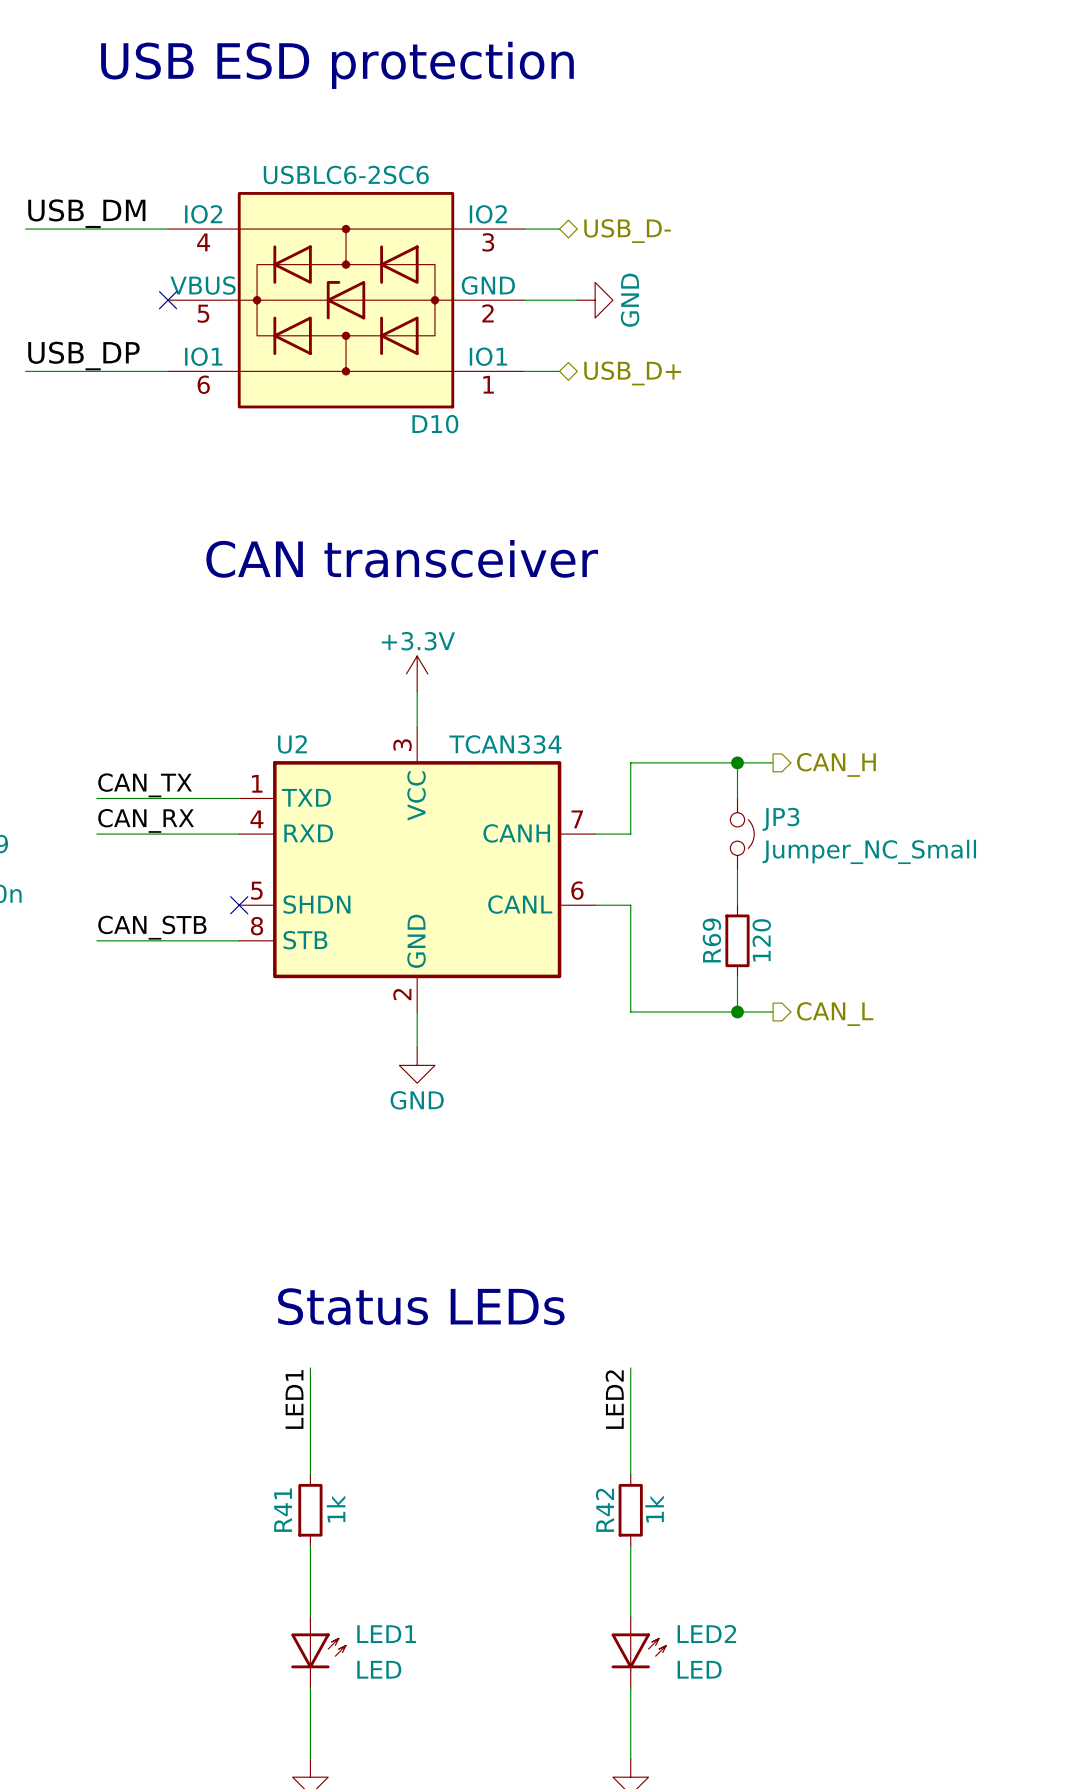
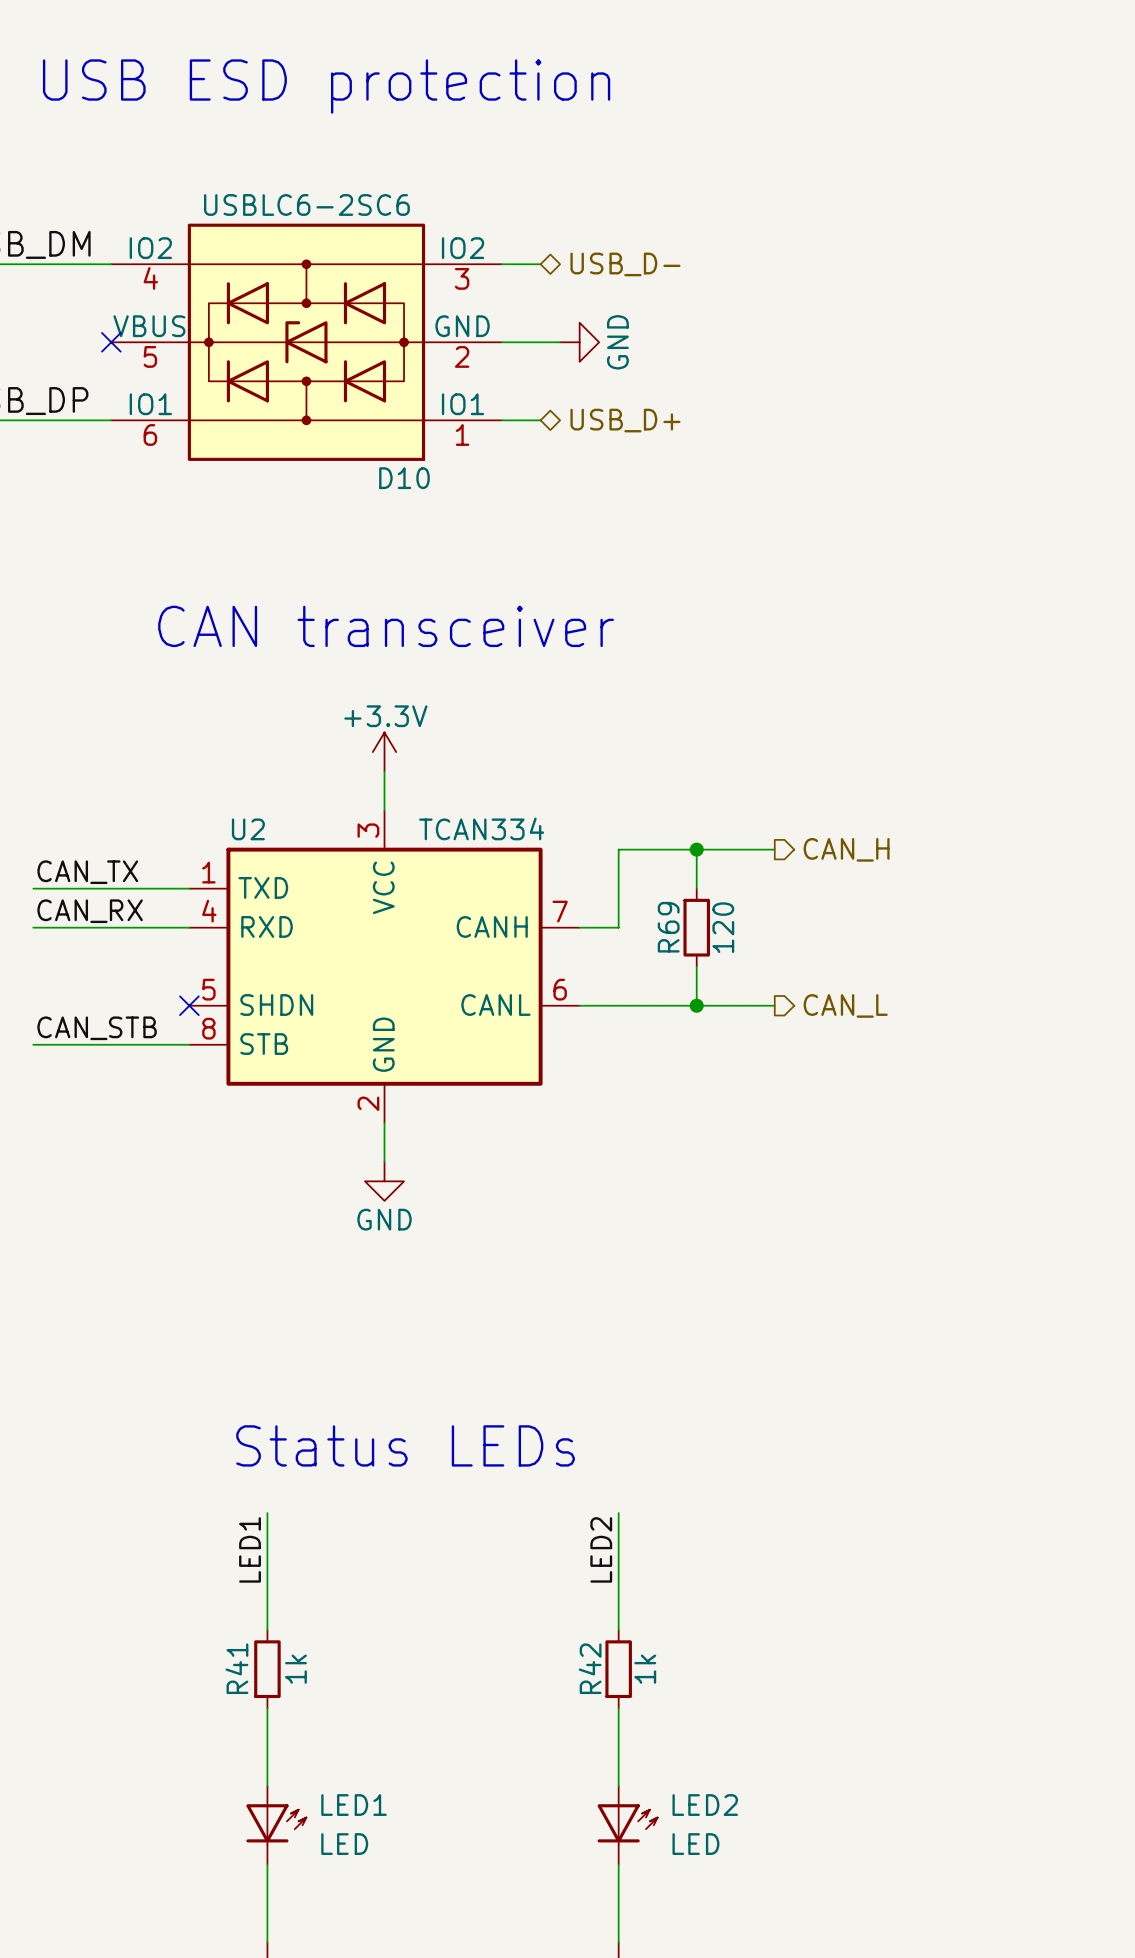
wire: (737, 762) (737, 798) -> (696, 849) (696, 888)
junction position: (737, 762) -> (696, 849)
JP3: Jumper_NC_Small (742, 834) -> none
wire: (737, 869) (737, 905) -> (696, 966) (696, 1005)
wire: (630, 905) (630, 1012) (773, 1012) -> (618, 1005) (774, 1005)
junction: none -> (696, 1005)
R69 position: (737, 940) -> (696, 927)
wire: (737, 976) (737, 1012) -> none
junction: (737, 1012) -> none
hierarchical label position: CAN_L (835, 1014) -> CAN_L (845, 1005)

